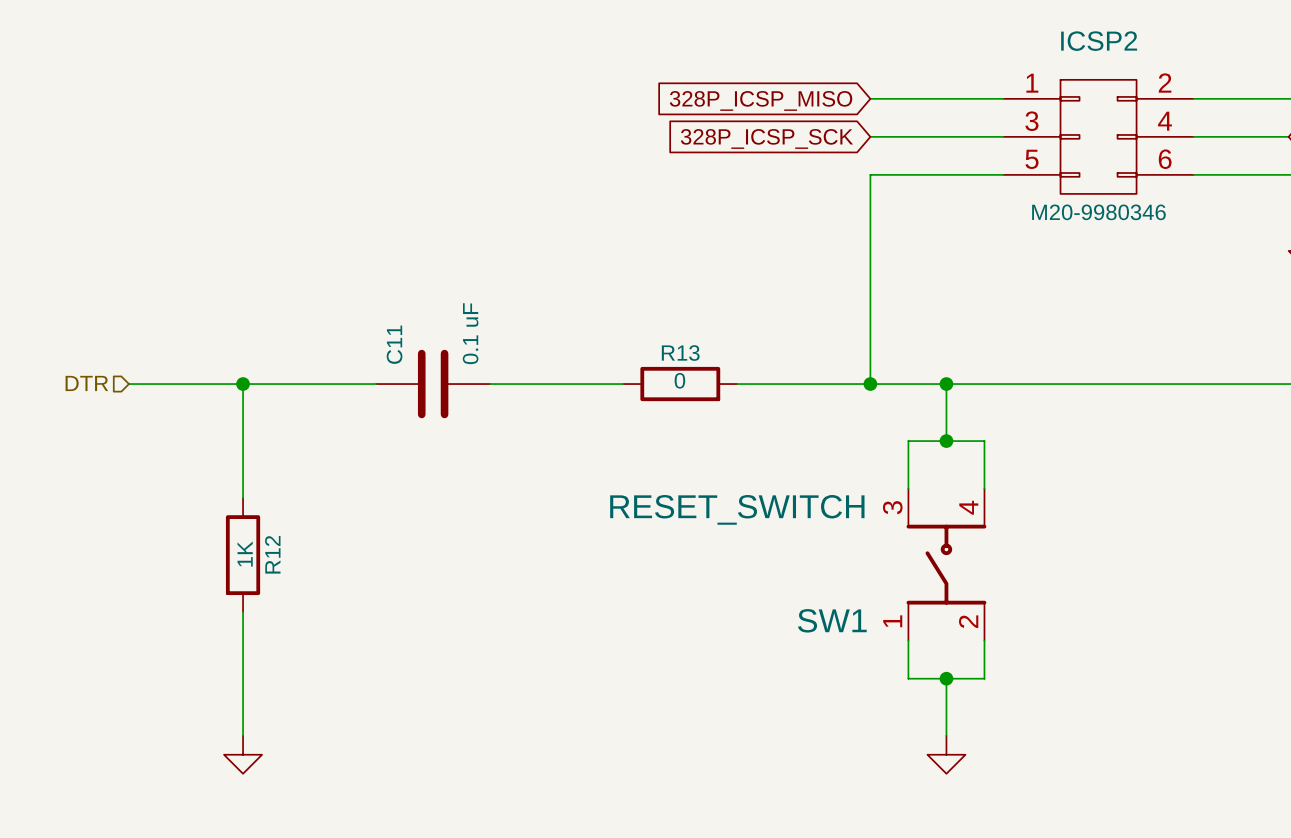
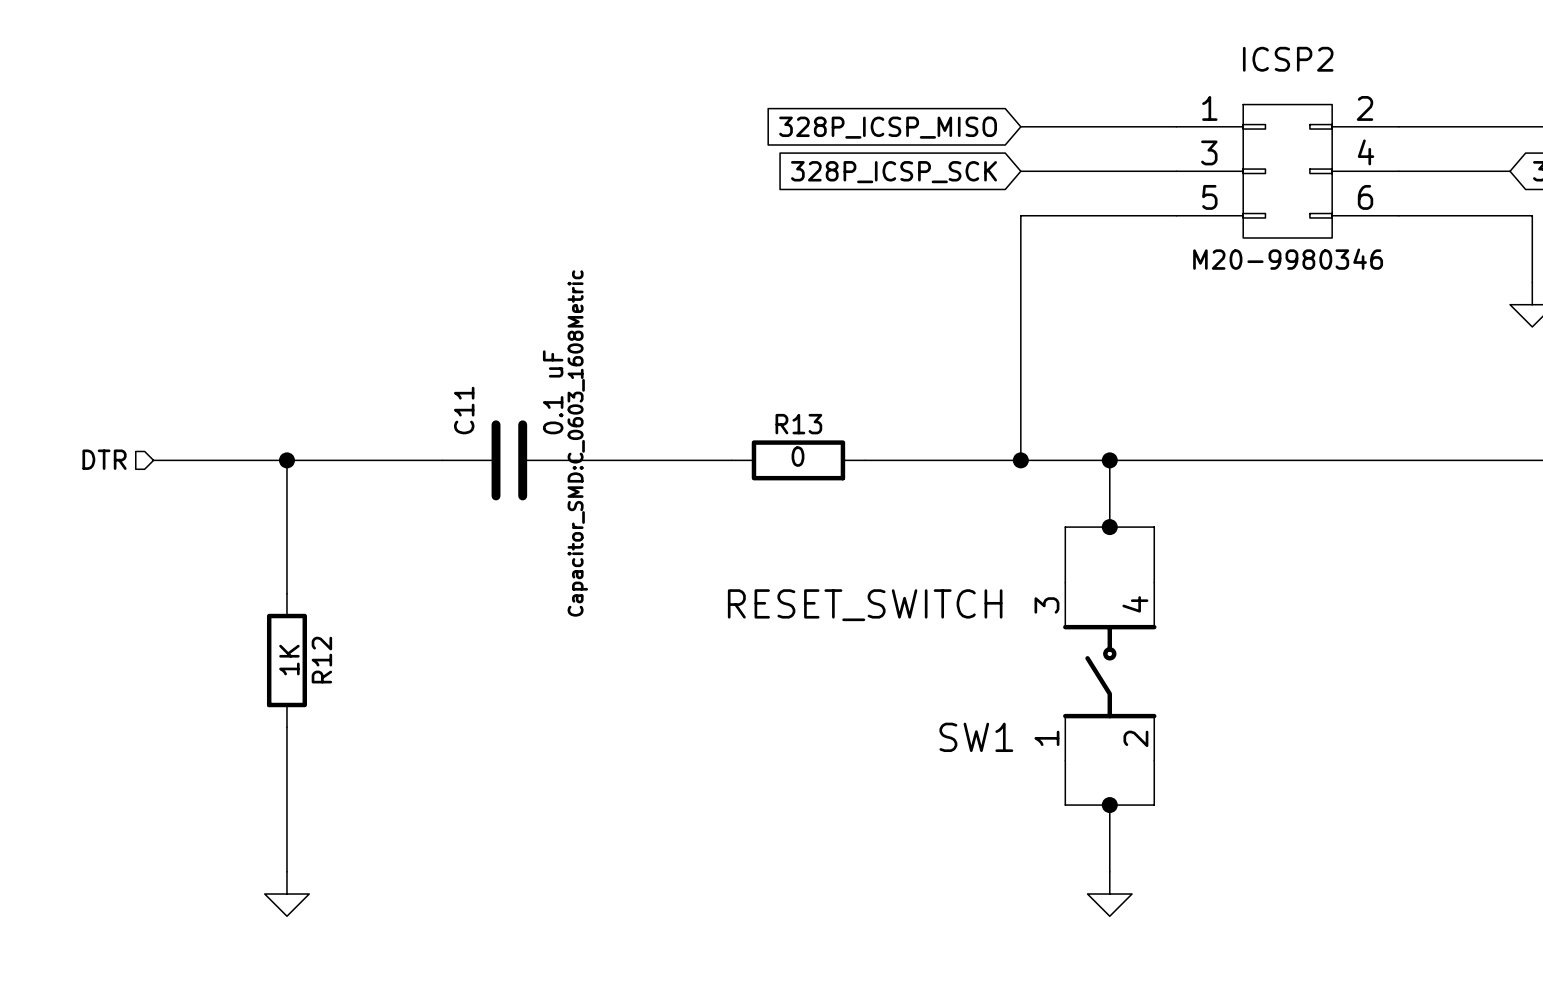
C11 text: none -> Capacitor_SMD:C_0603_1608Metric (577, 443)

